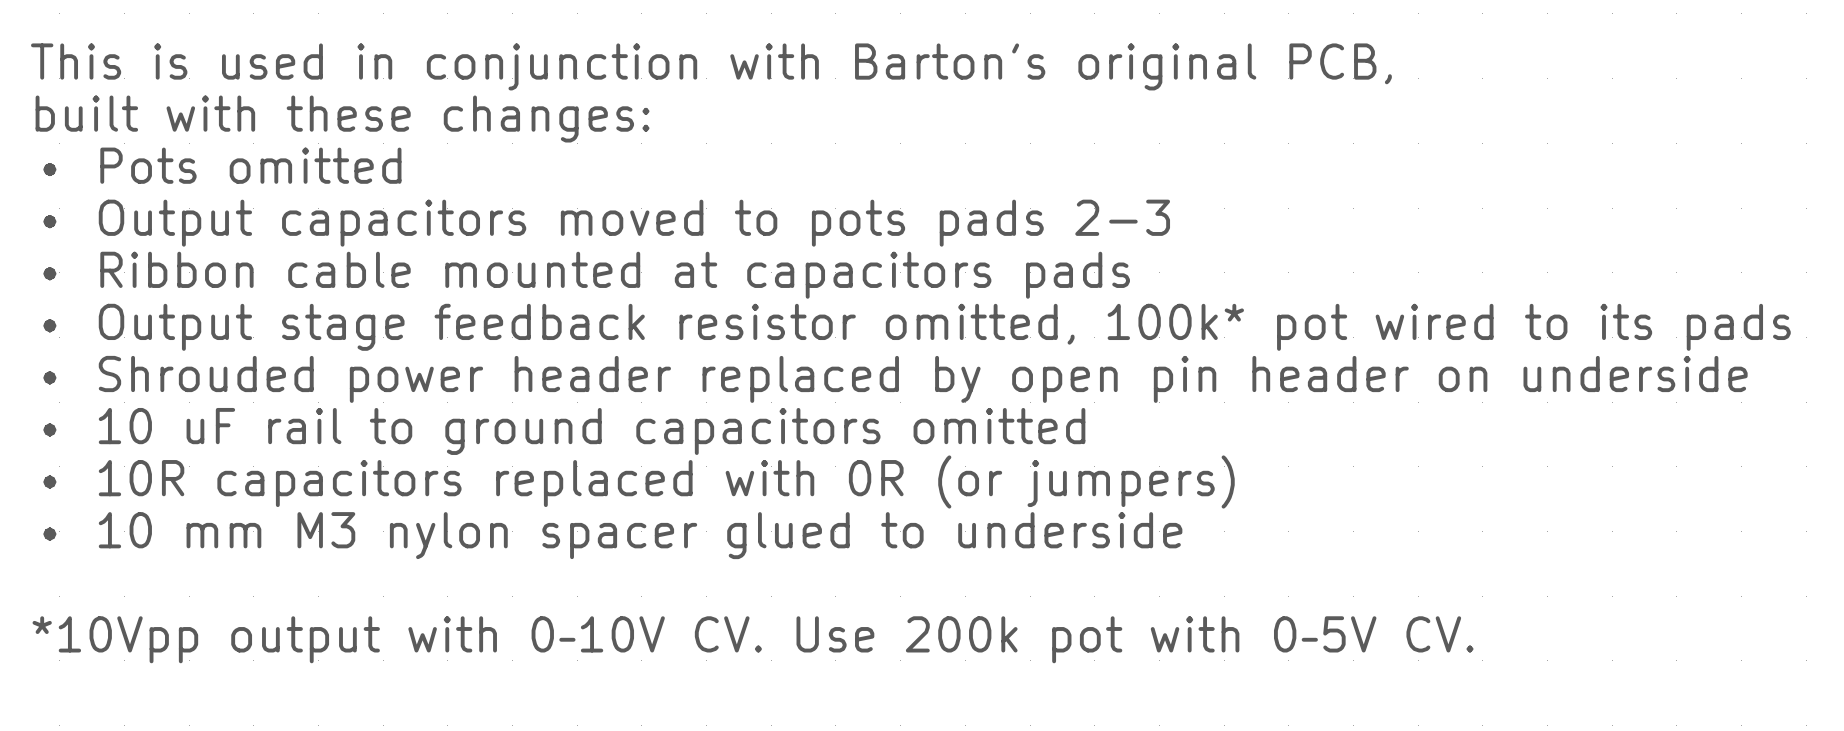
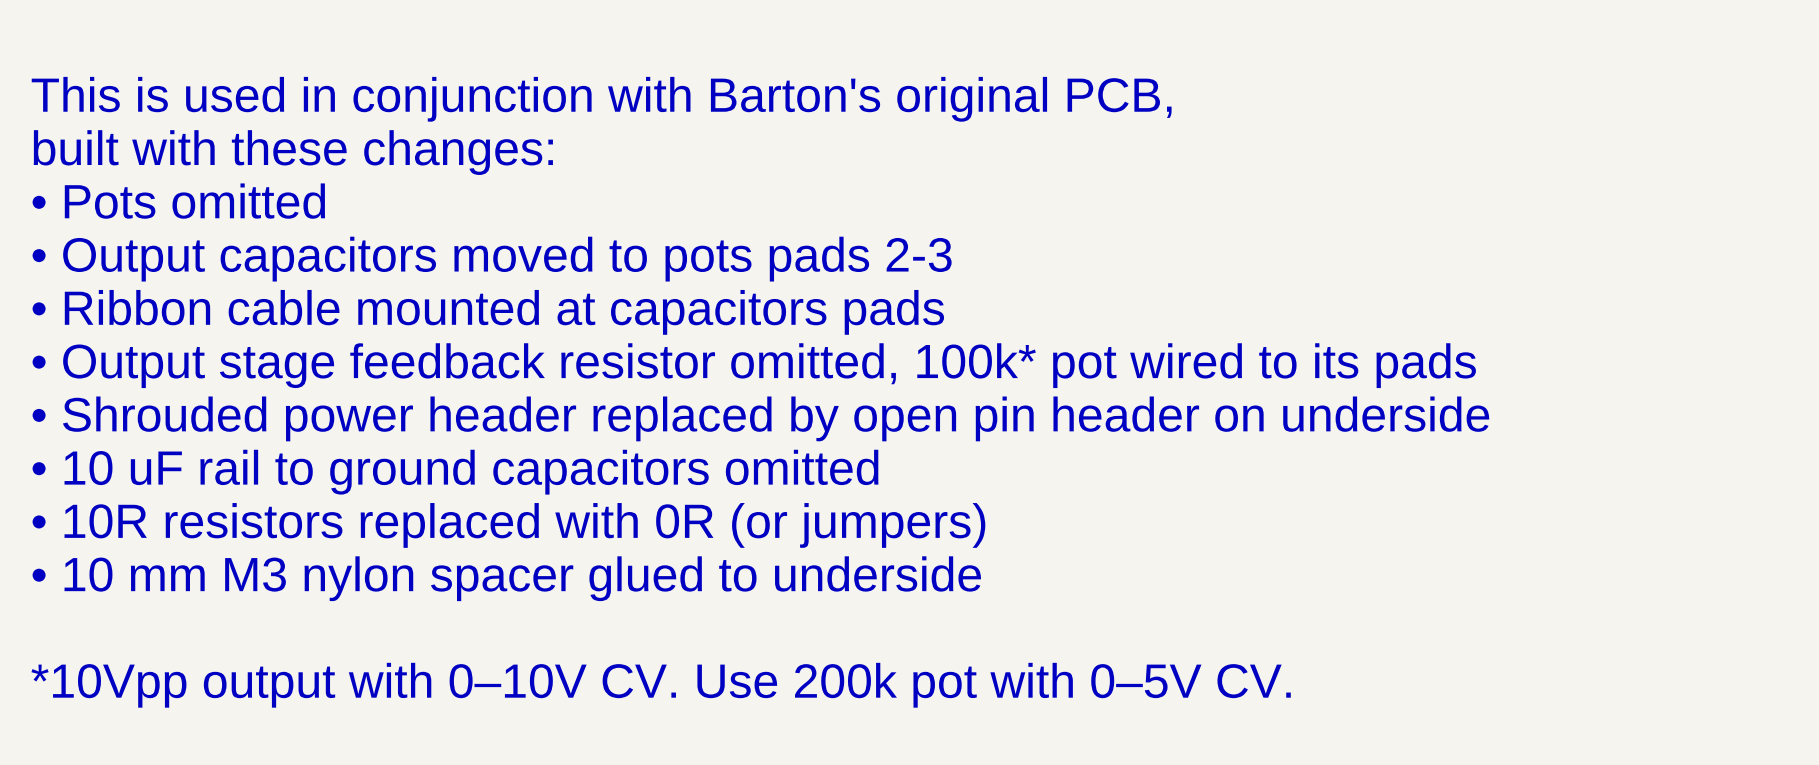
text: • 10R capacitors replaced with 0R (or jumpers) (639, 482) -> • 10R resistors replaced with 0R (or jumpers) (508, 525)

